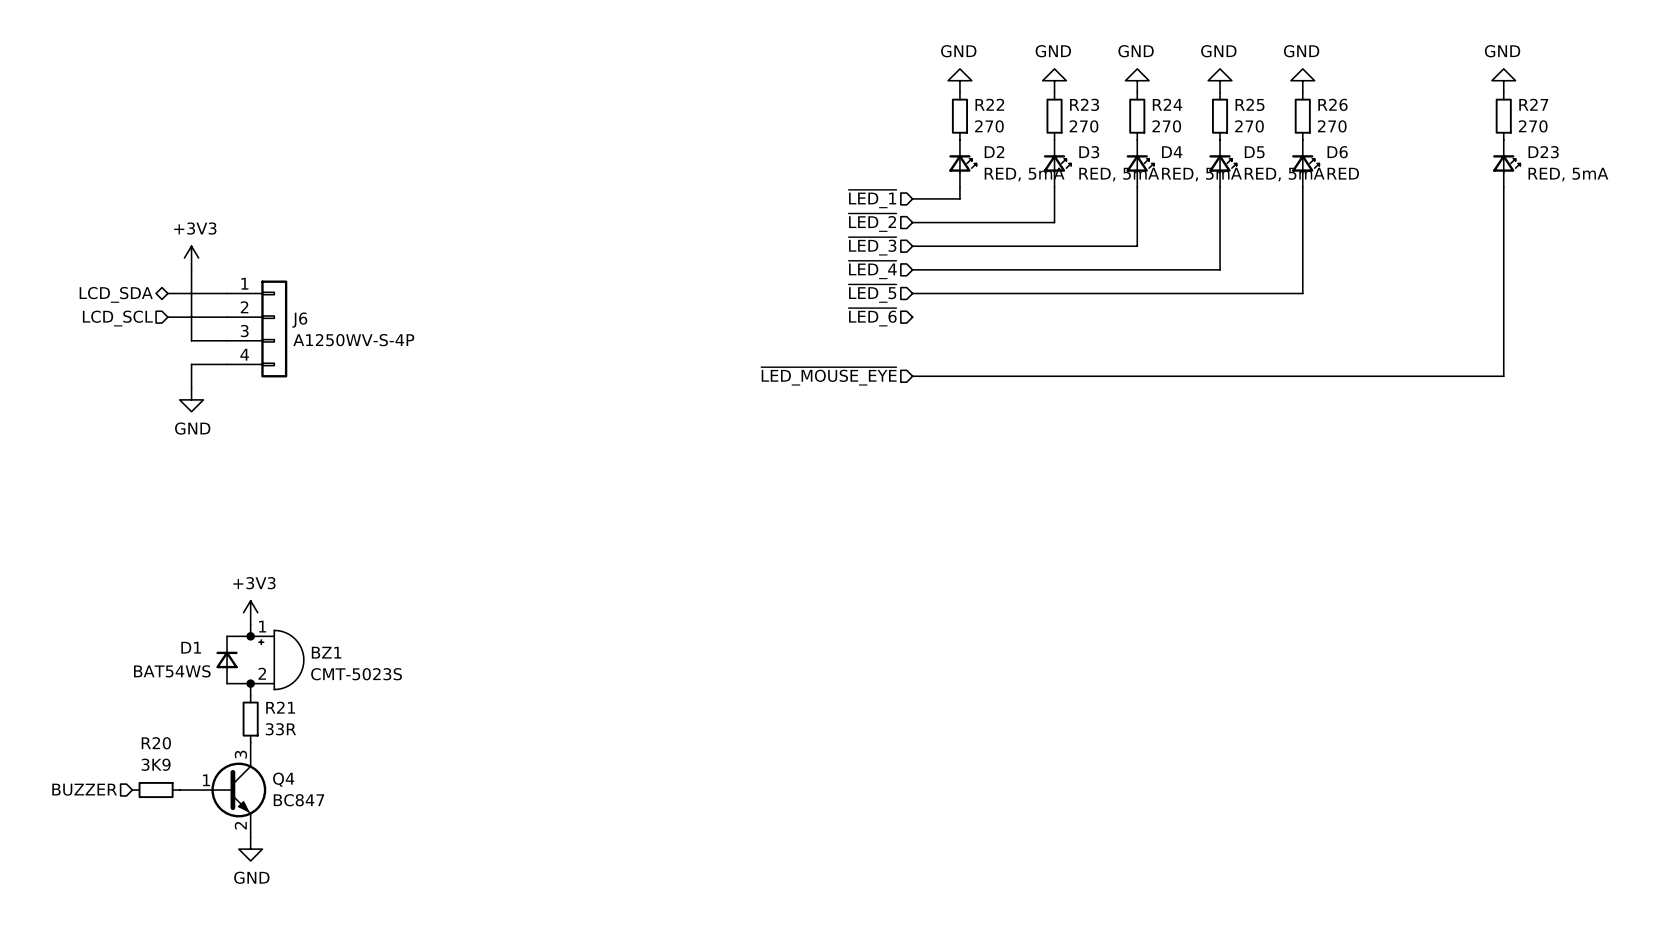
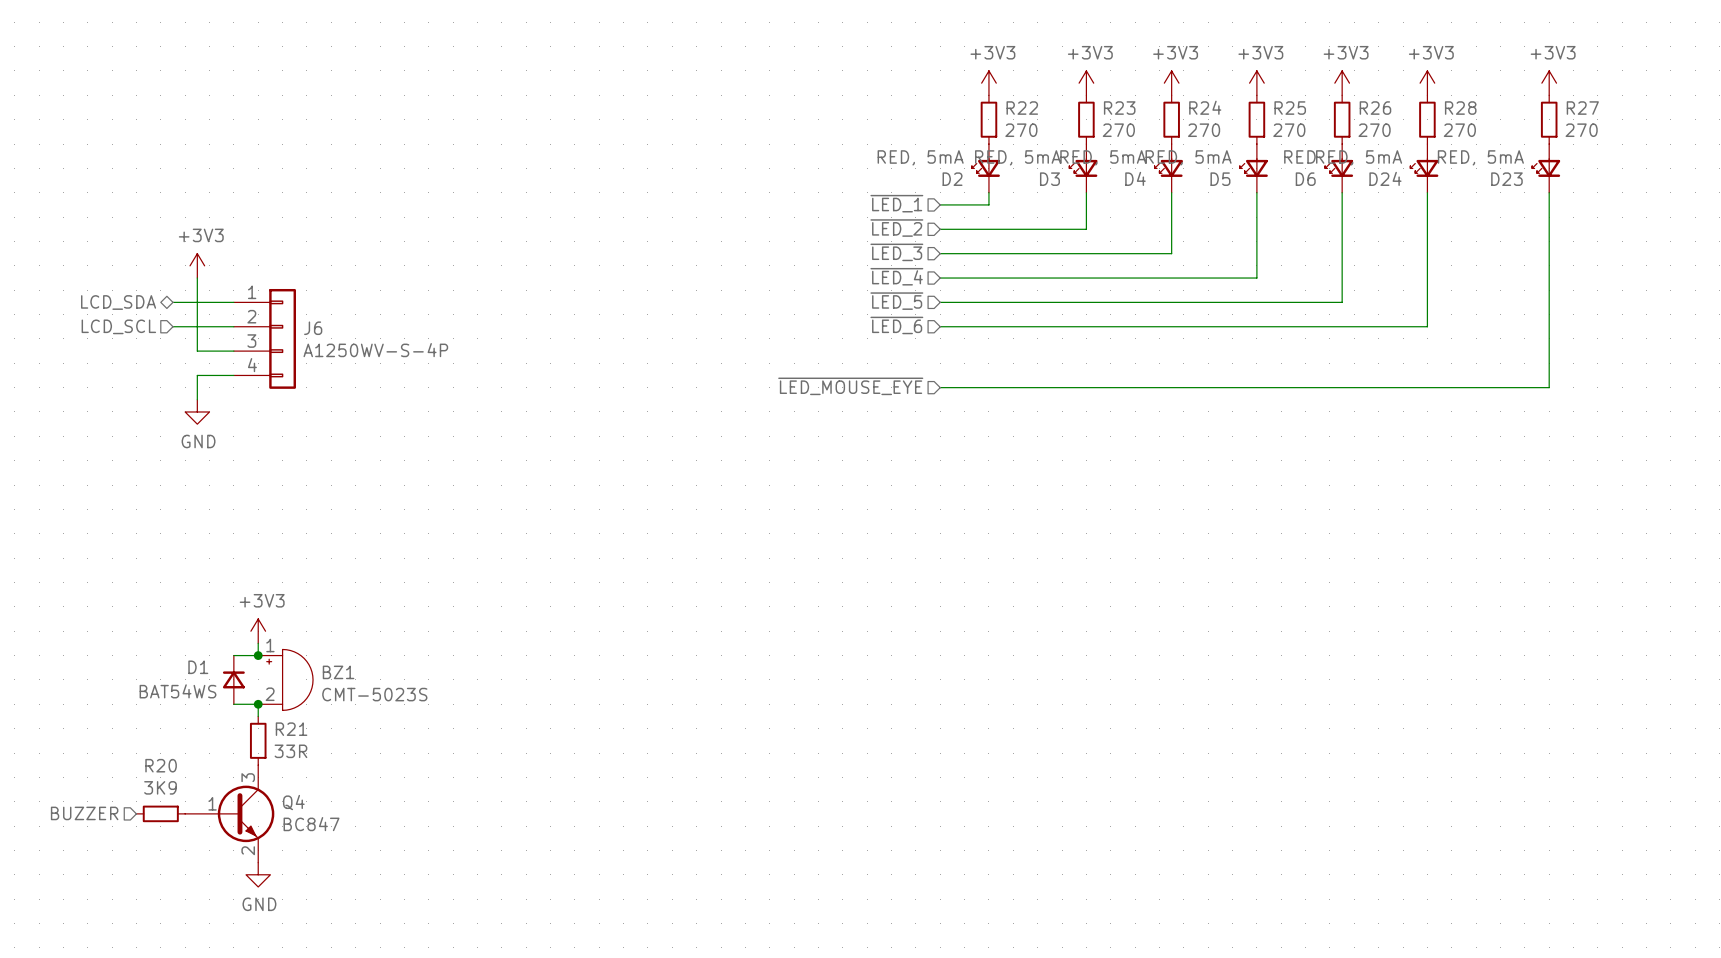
power symbol: GND (959, 80) -> +3V3 (988, 83)
power symbol: GND (1054, 80) -> +3V3 (1086, 83)
power symbol: GND (1137, 80) -> +3V3 (1171, 83)
power symbol: GND (1220, 80) -> +3V3 (1256, 83)
power symbol: GND (1302, 80) -> +3V3 (1342, 83)
power symbol: none -> +3V3 (1427, 83)
power symbol: GND (1503, 80) -> +3V3 (1549, 83)
R28: none -> 270 (1427, 119)
D24: none -> RED, 5mA (1424, 168)
D2 rotation: 0° (962, 164) -> 180° (985, 167)
D3 rotation: 0° (1057, 164) -> 180° (1083, 167)
D4 rotation: 0° (1140, 164) -> 180° (1168, 167)
D5 rotation: 0° (1222, 164) -> 180° (1253, 167)
D6 rotation: 0° (1305, 164) -> 180° (1339, 167)
D23 rotation: 0° (1506, 164) -> 180° (1546, 167)
wire: none -> (1427, 192) (1427, 326) (940, 326)

